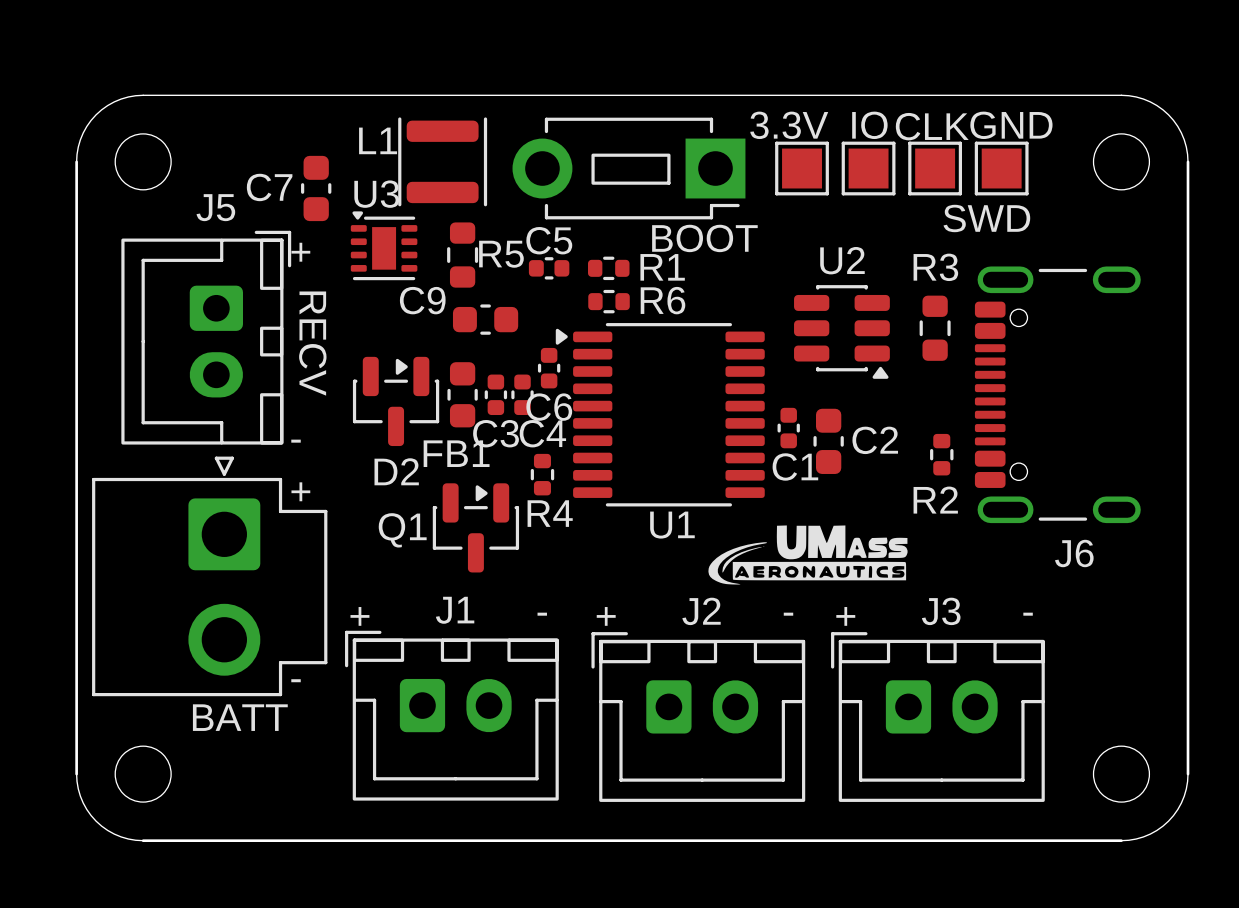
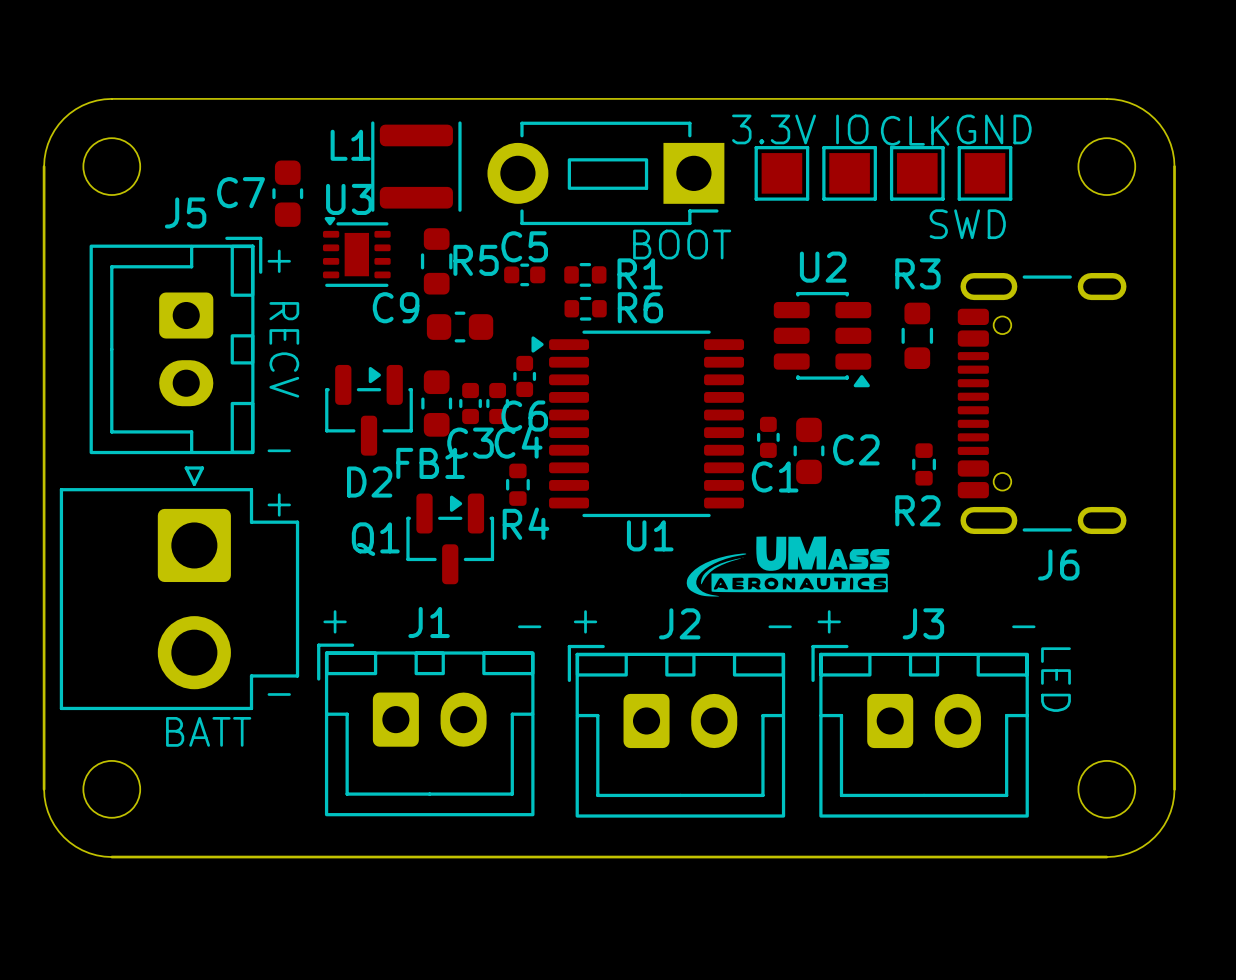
text: none -> LED (1055, 679)

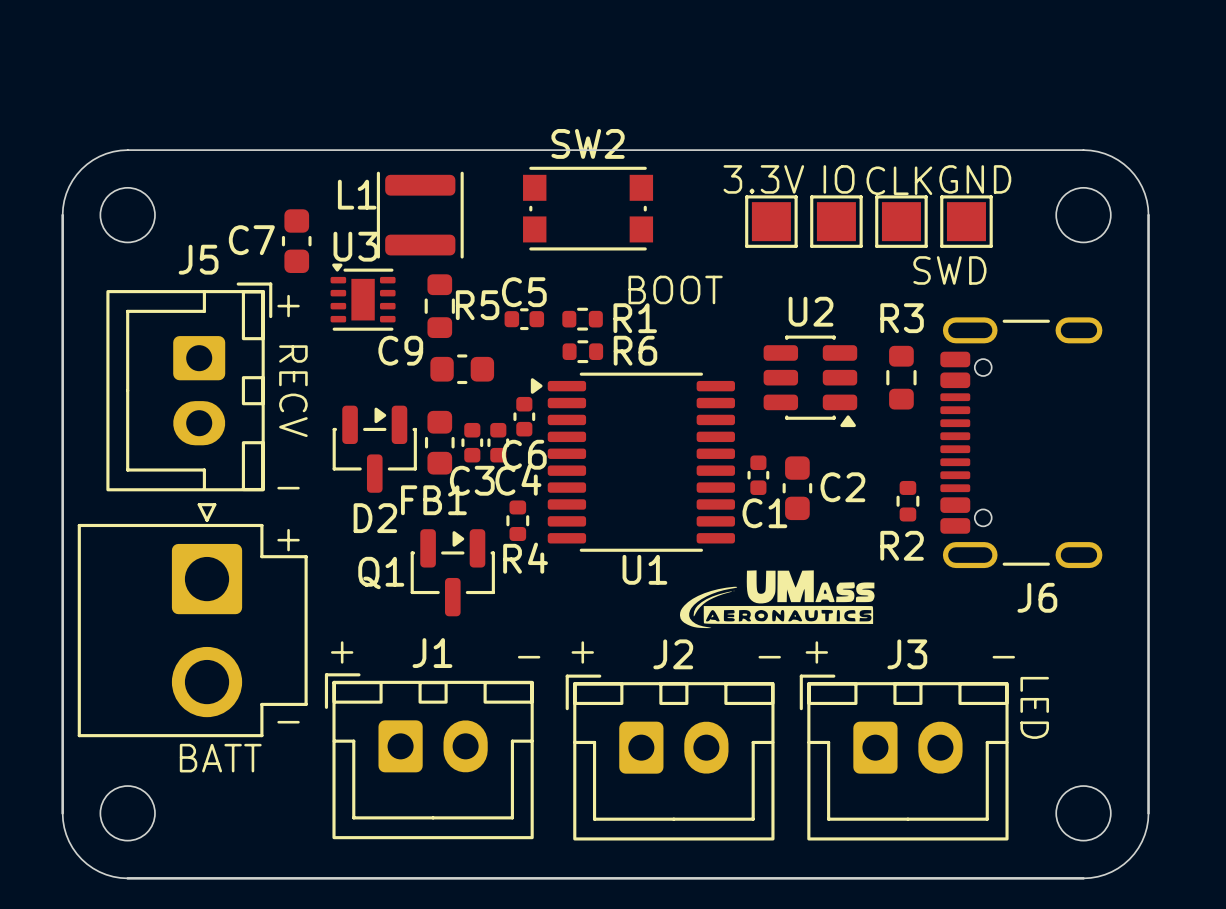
SW2: none -> (588, 208)
part: (605, 173) -> none

